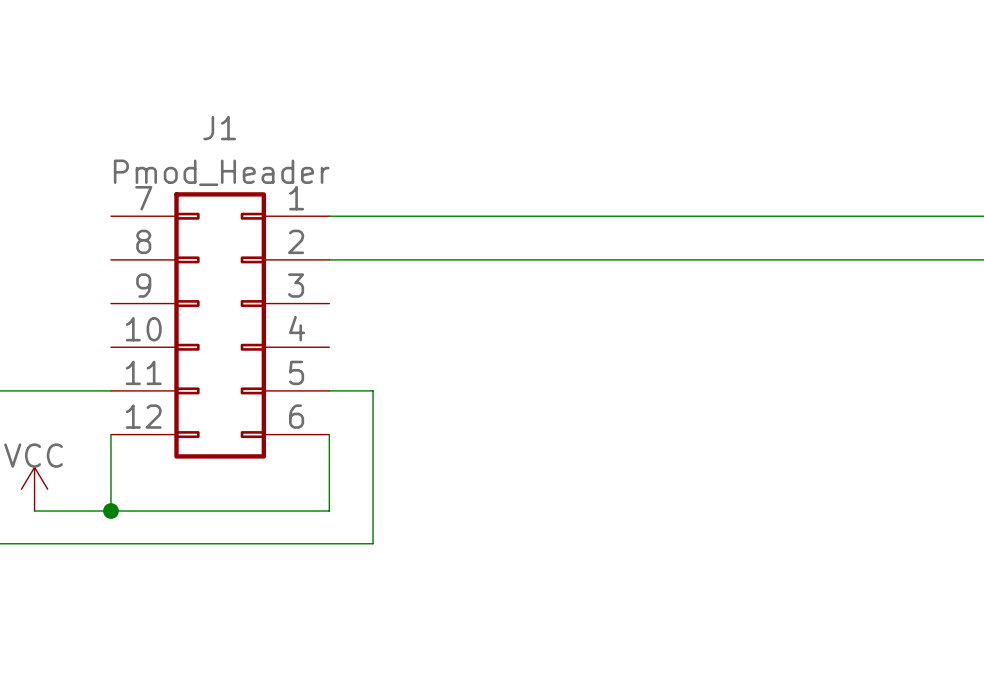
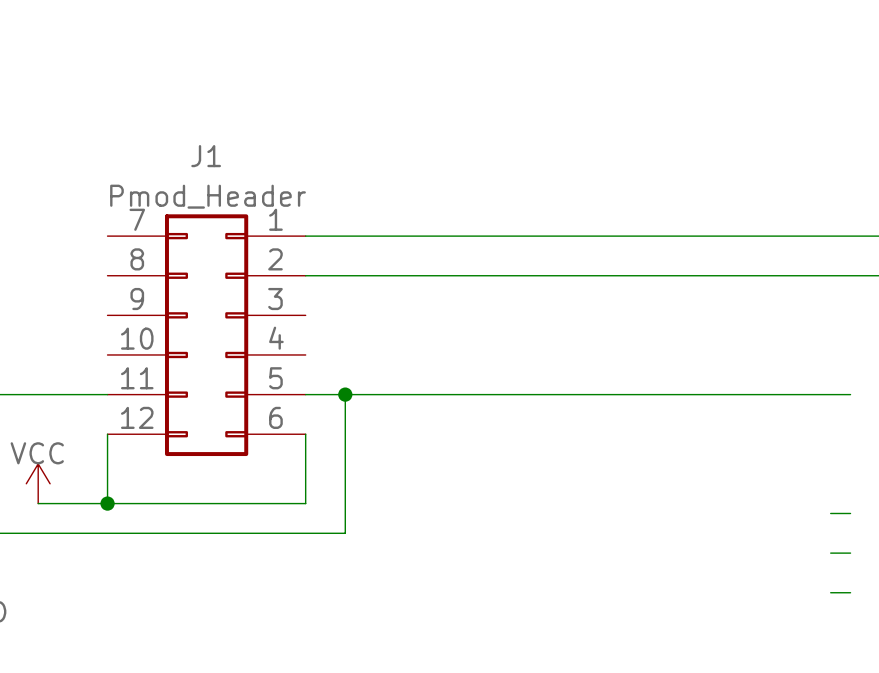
wire: none -> (345, 394) (850, 394)
junction: none -> (345, 394)
wire: none -> (830, 513) (850, 513)
wire: none -> (830, 553) (850, 553)
wire: none -> (830, 592) (850, 592)

